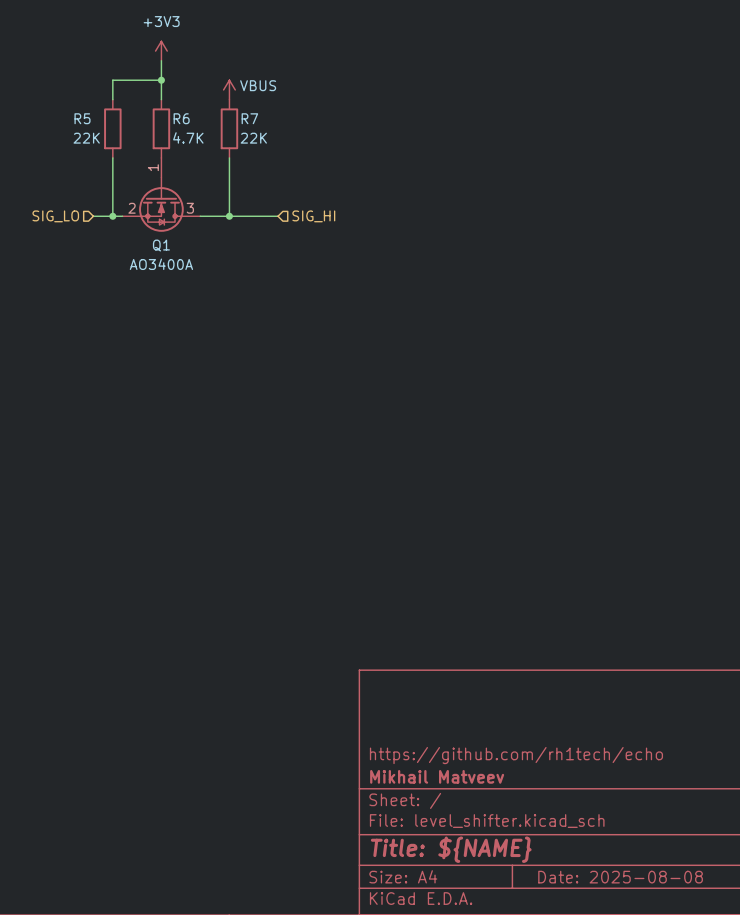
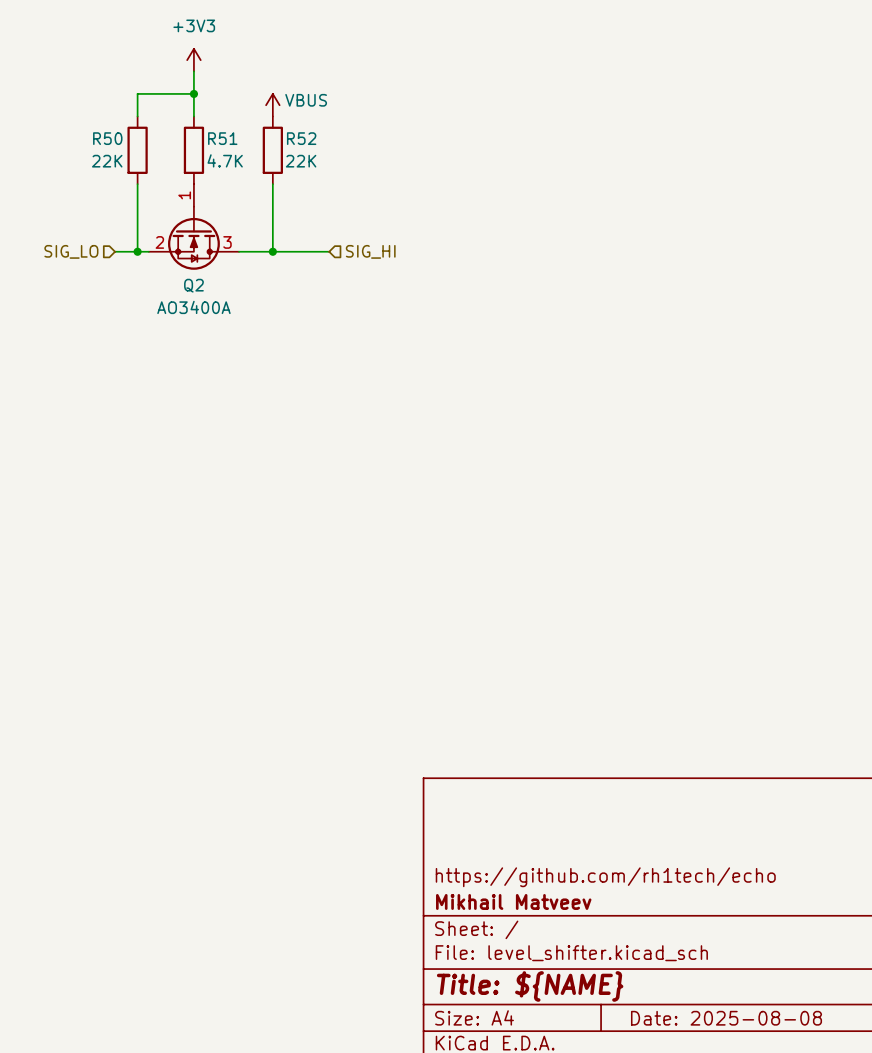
R5 name: R5 (82, 118) -> R50 (107, 138)
R6 name: R6 (181, 118) -> R51 (222, 138)
R7 name: R7 (249, 118) -> R52 (301, 138)
Q1 name: Q1 (161, 245) -> Q2 (193, 285)

